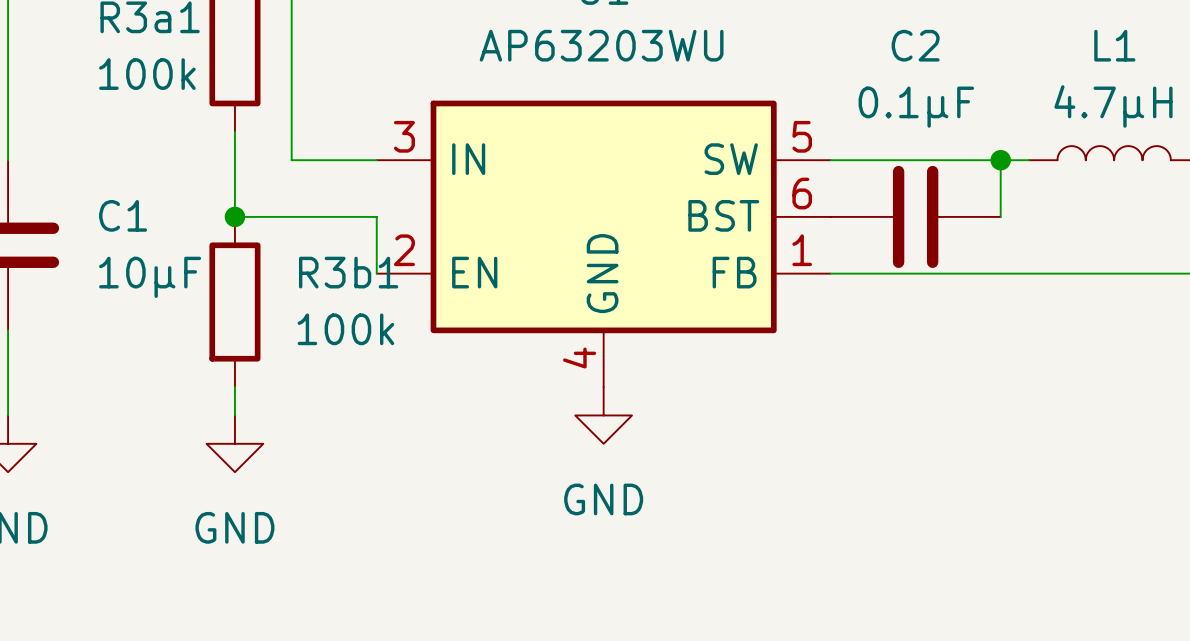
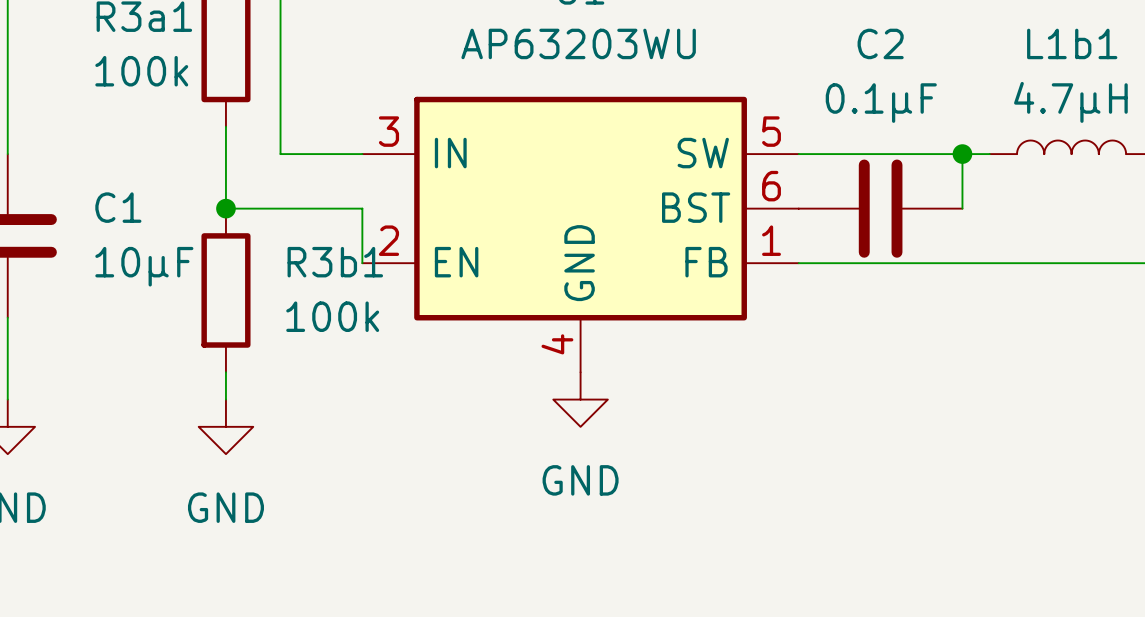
L1 name: L1 (1114, 45) -> L1b1 (1072, 43)

